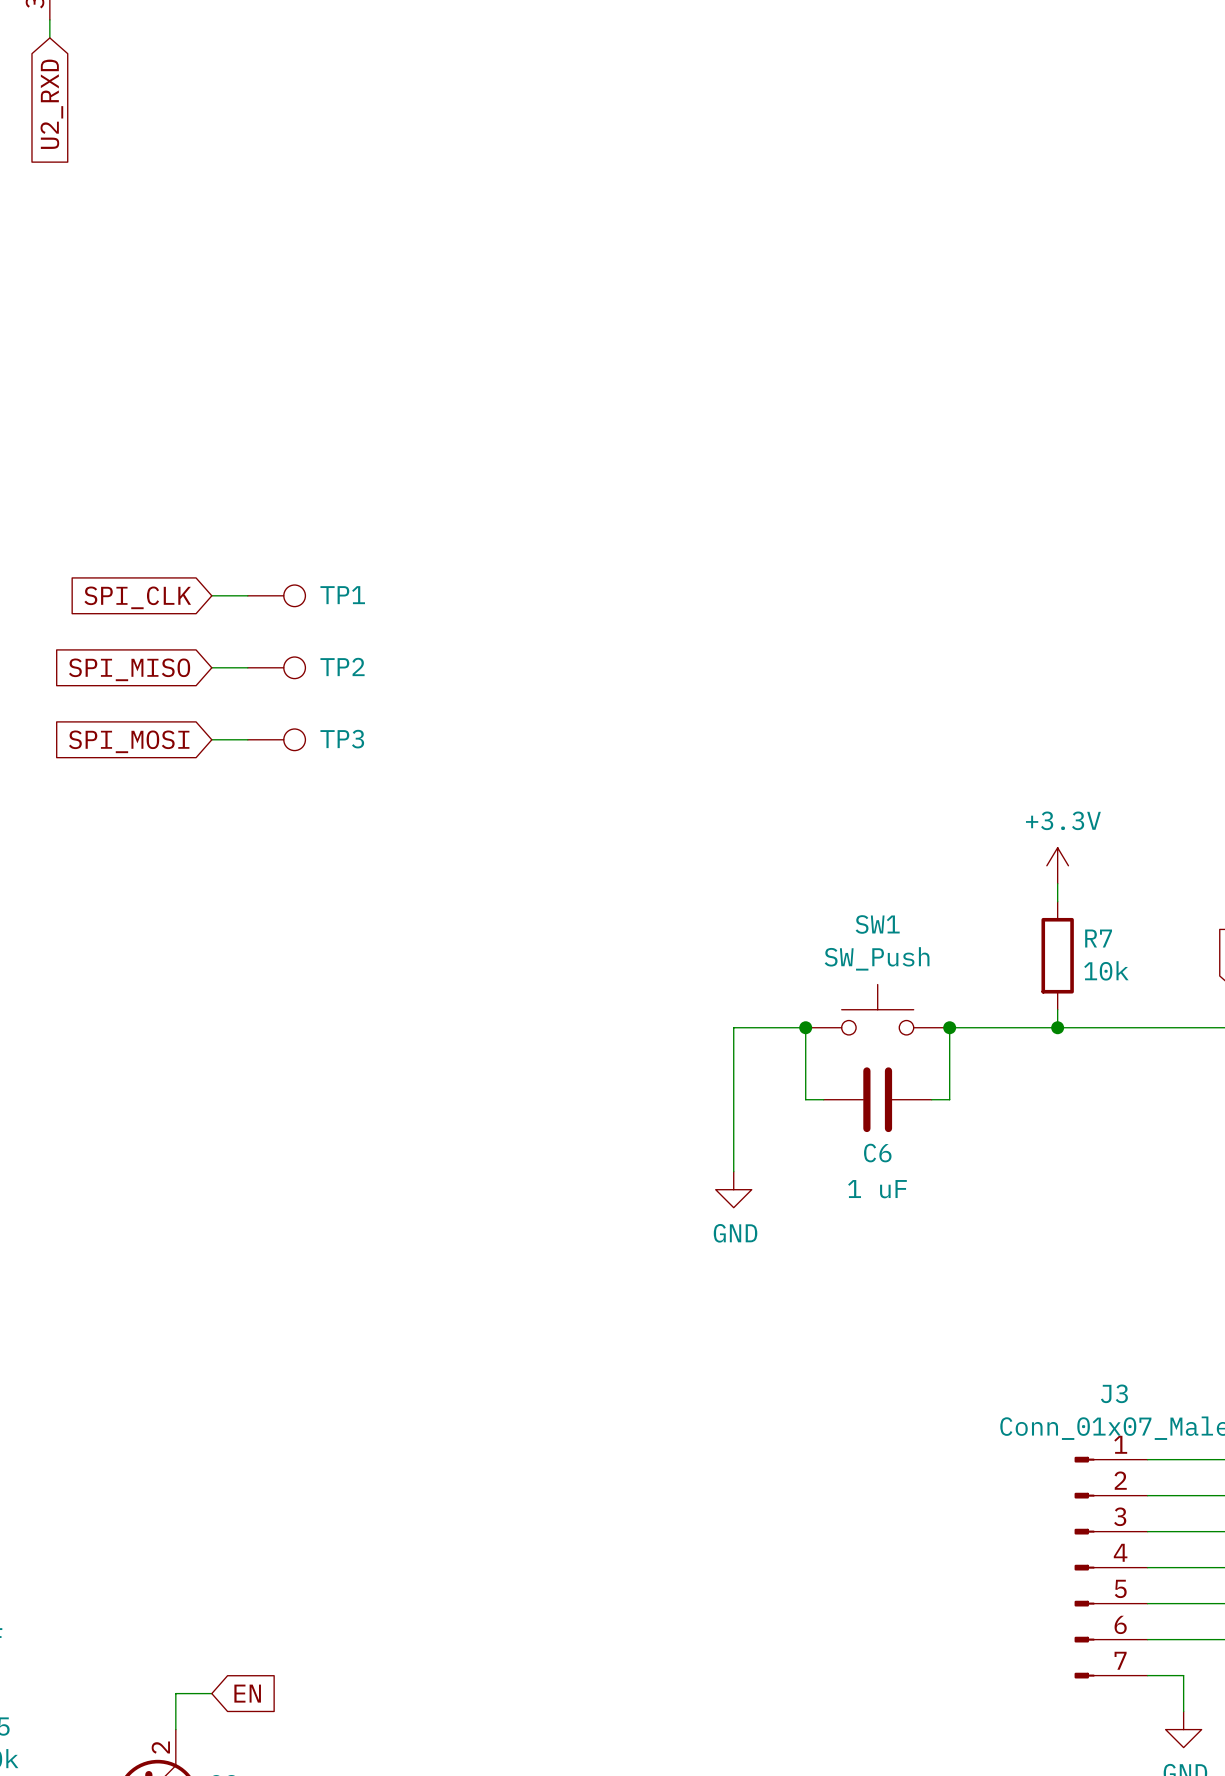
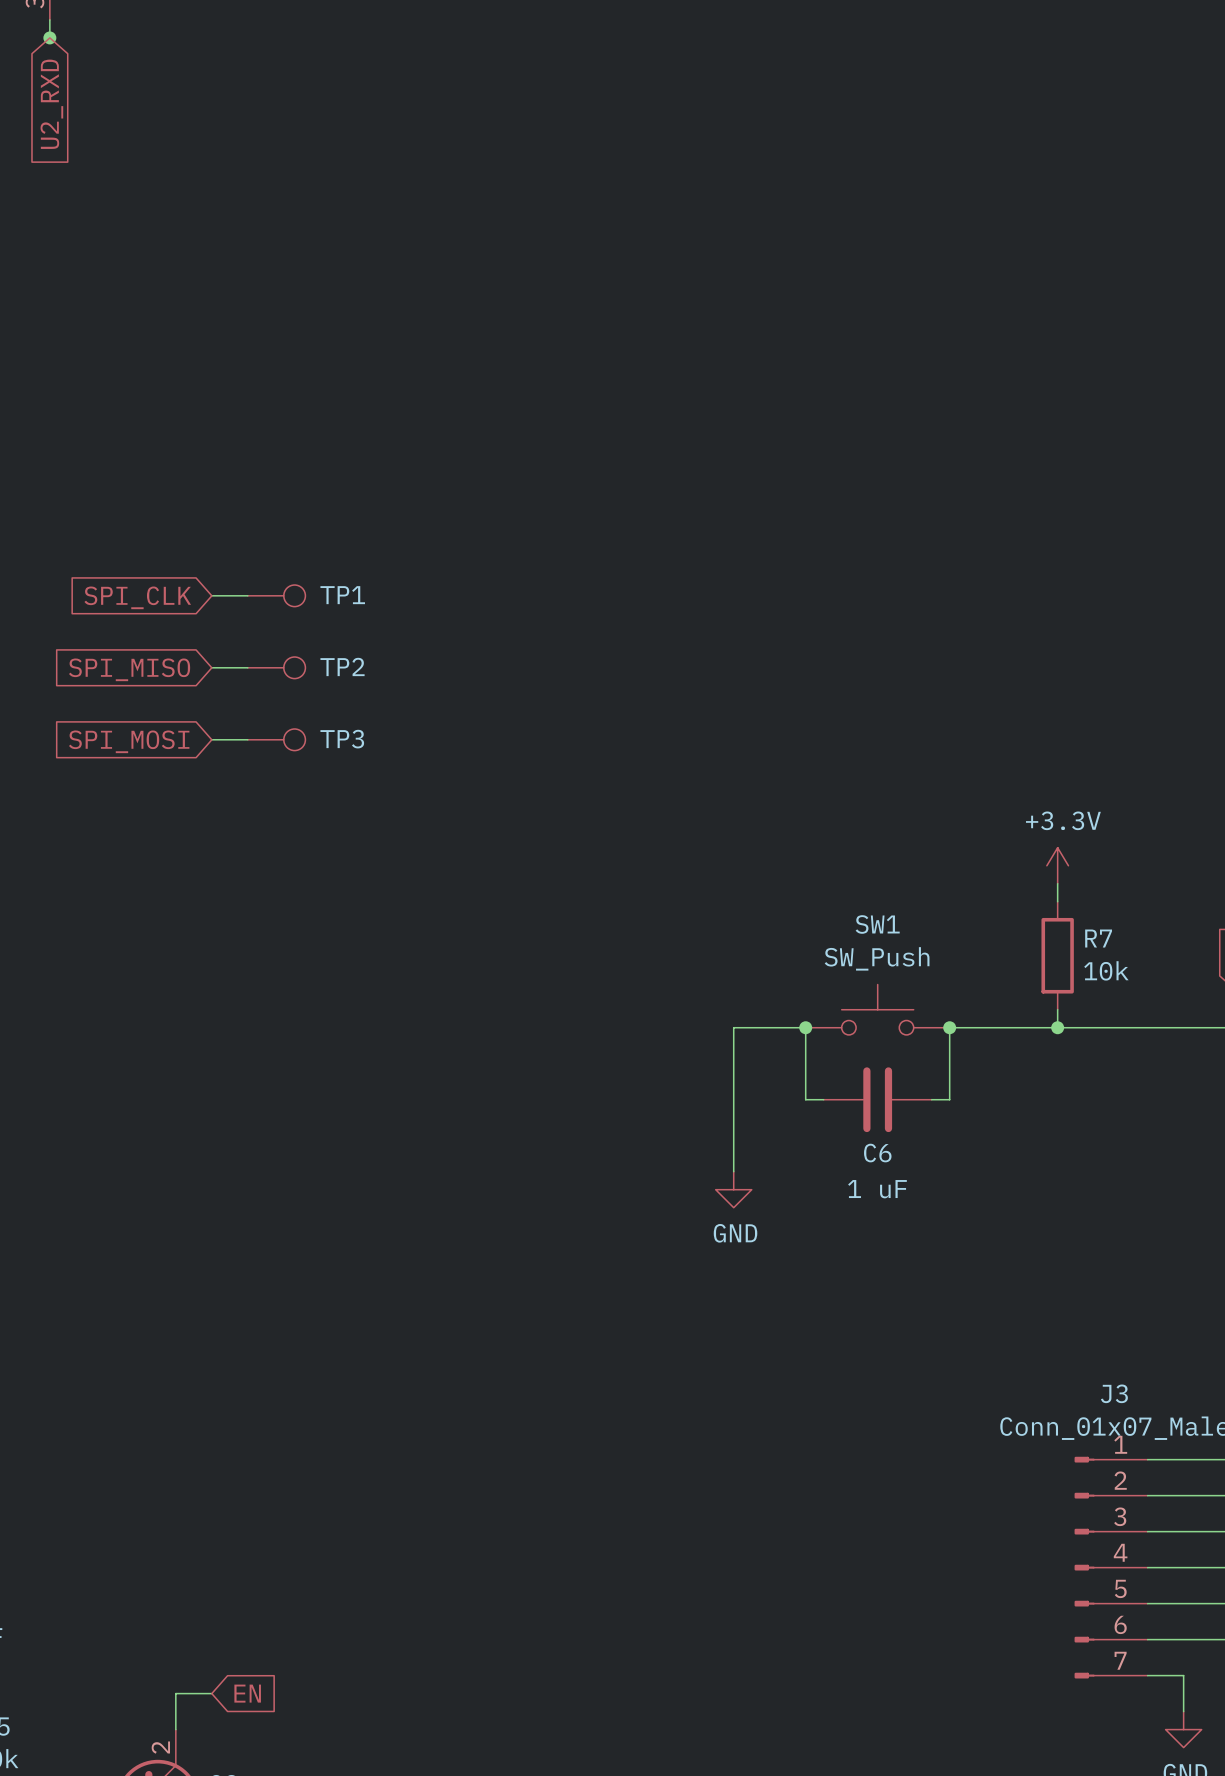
junction: none -> (49, 37)

